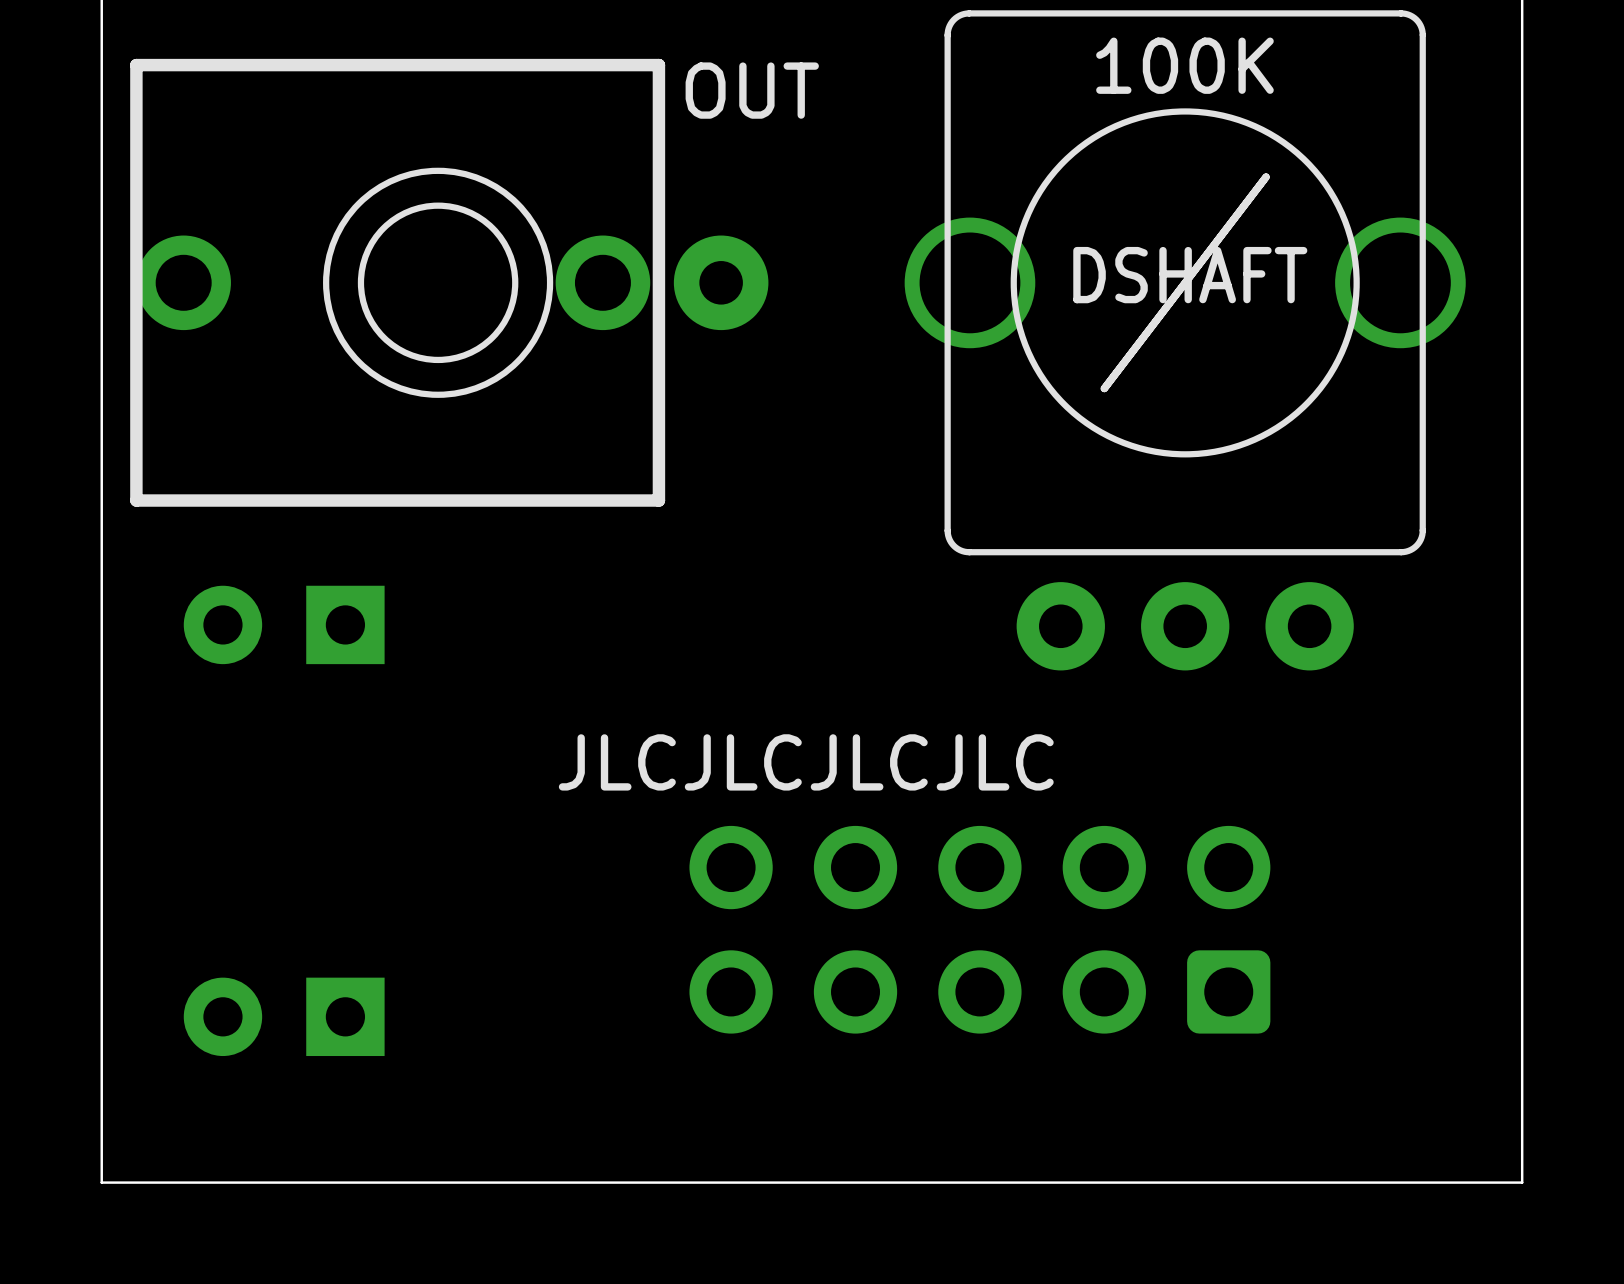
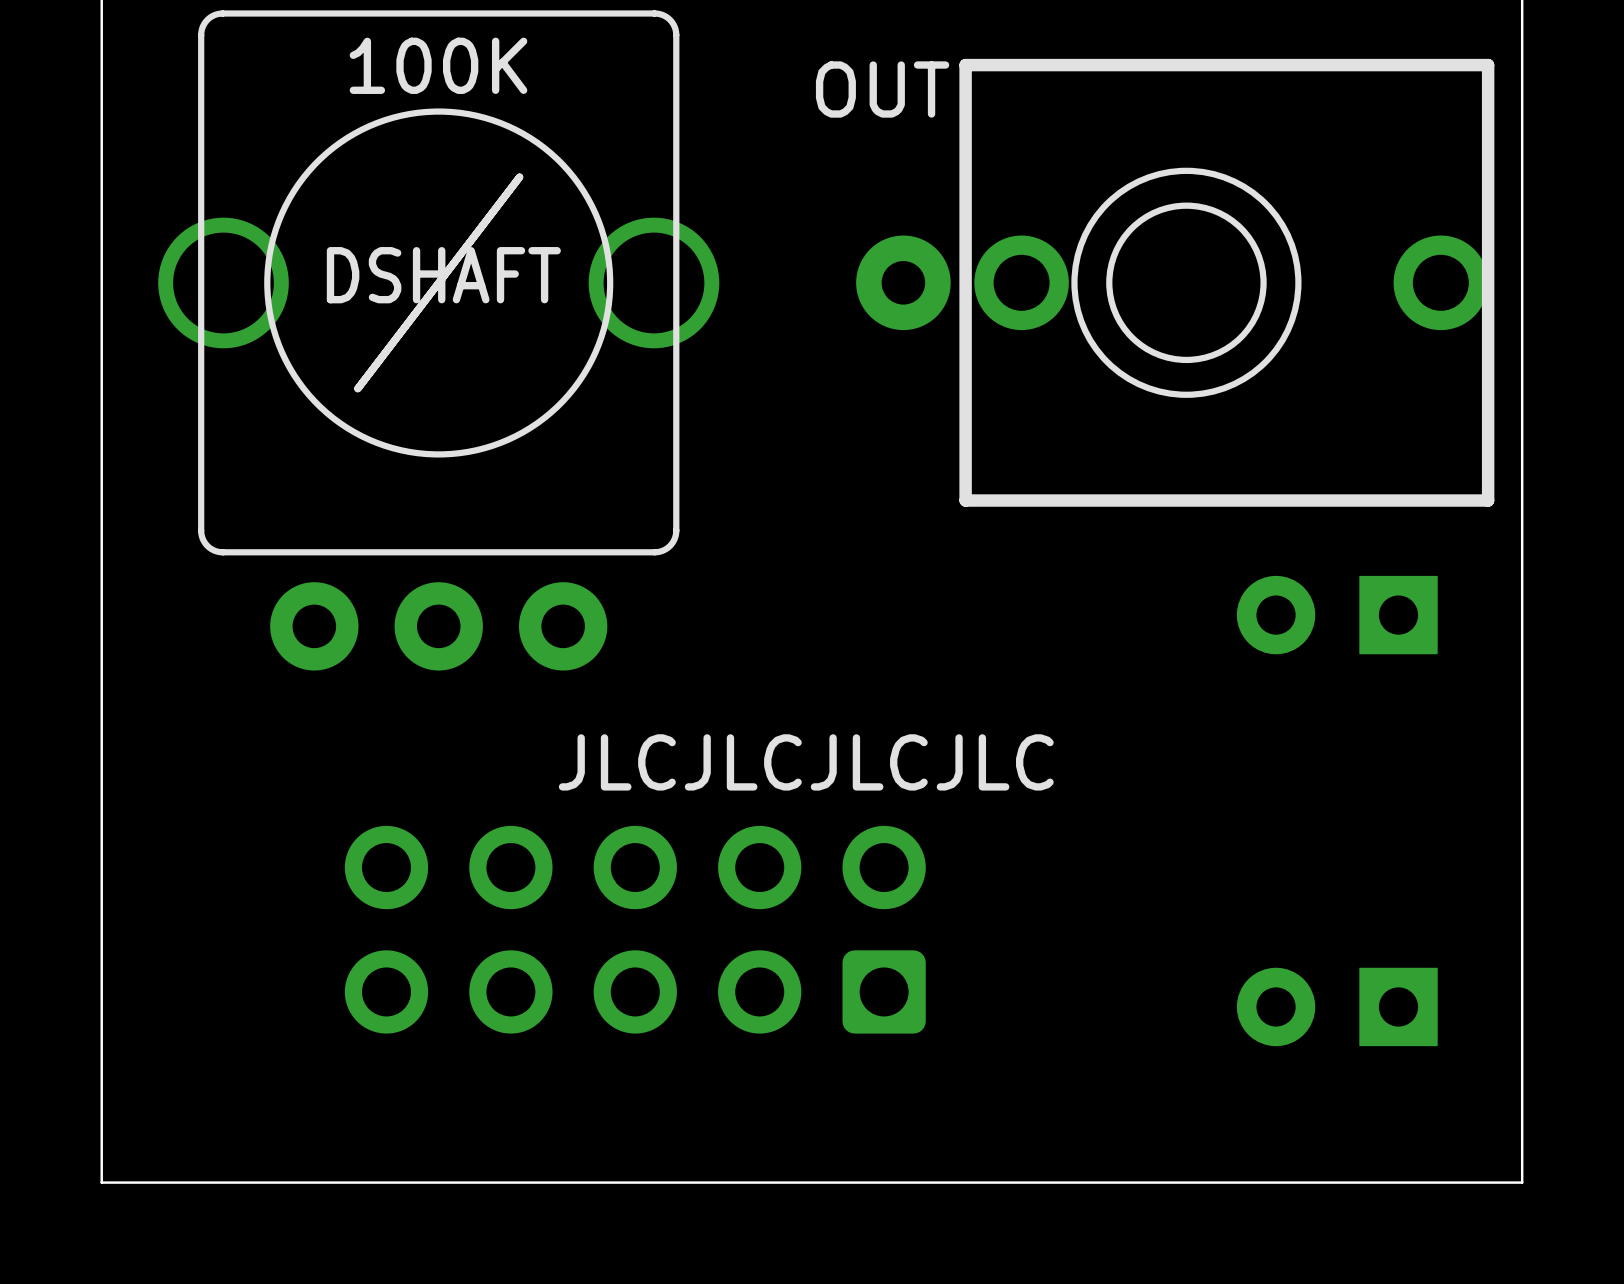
part value position: OUT (752, 90) -> OUT (882, 89)
part rotation: 0° (449, 282) -> 180° (1175, 282)
part position: (449, 282) -> (1175, 282)
part position: (1185, 340) -> (438, 340)
part: none -> (1337, 615)
part: (284, 624) -> none
part position: (979, 929) -> (635, 929)
part: none -> (1337, 1006)
part: (284, 1016) -> none

